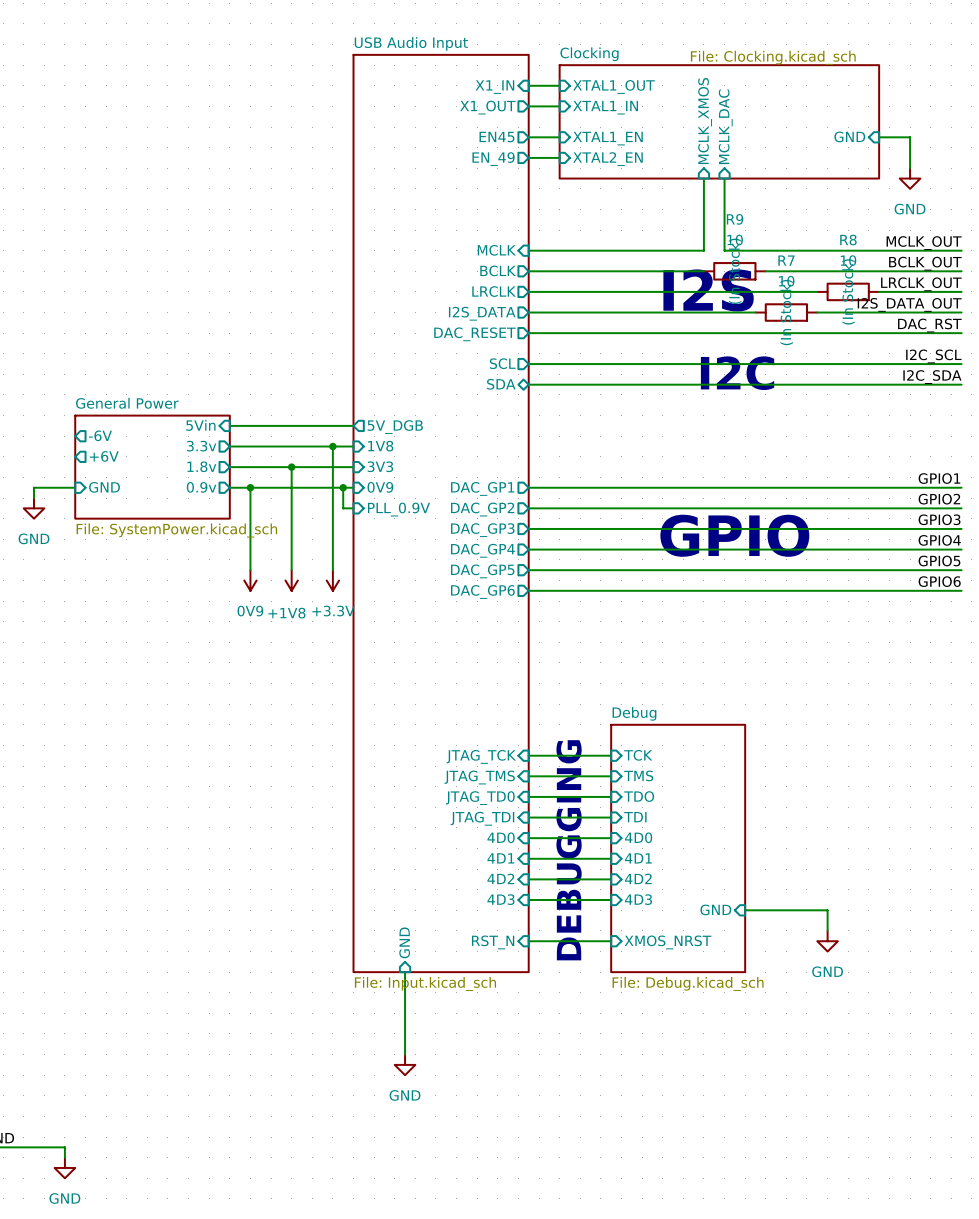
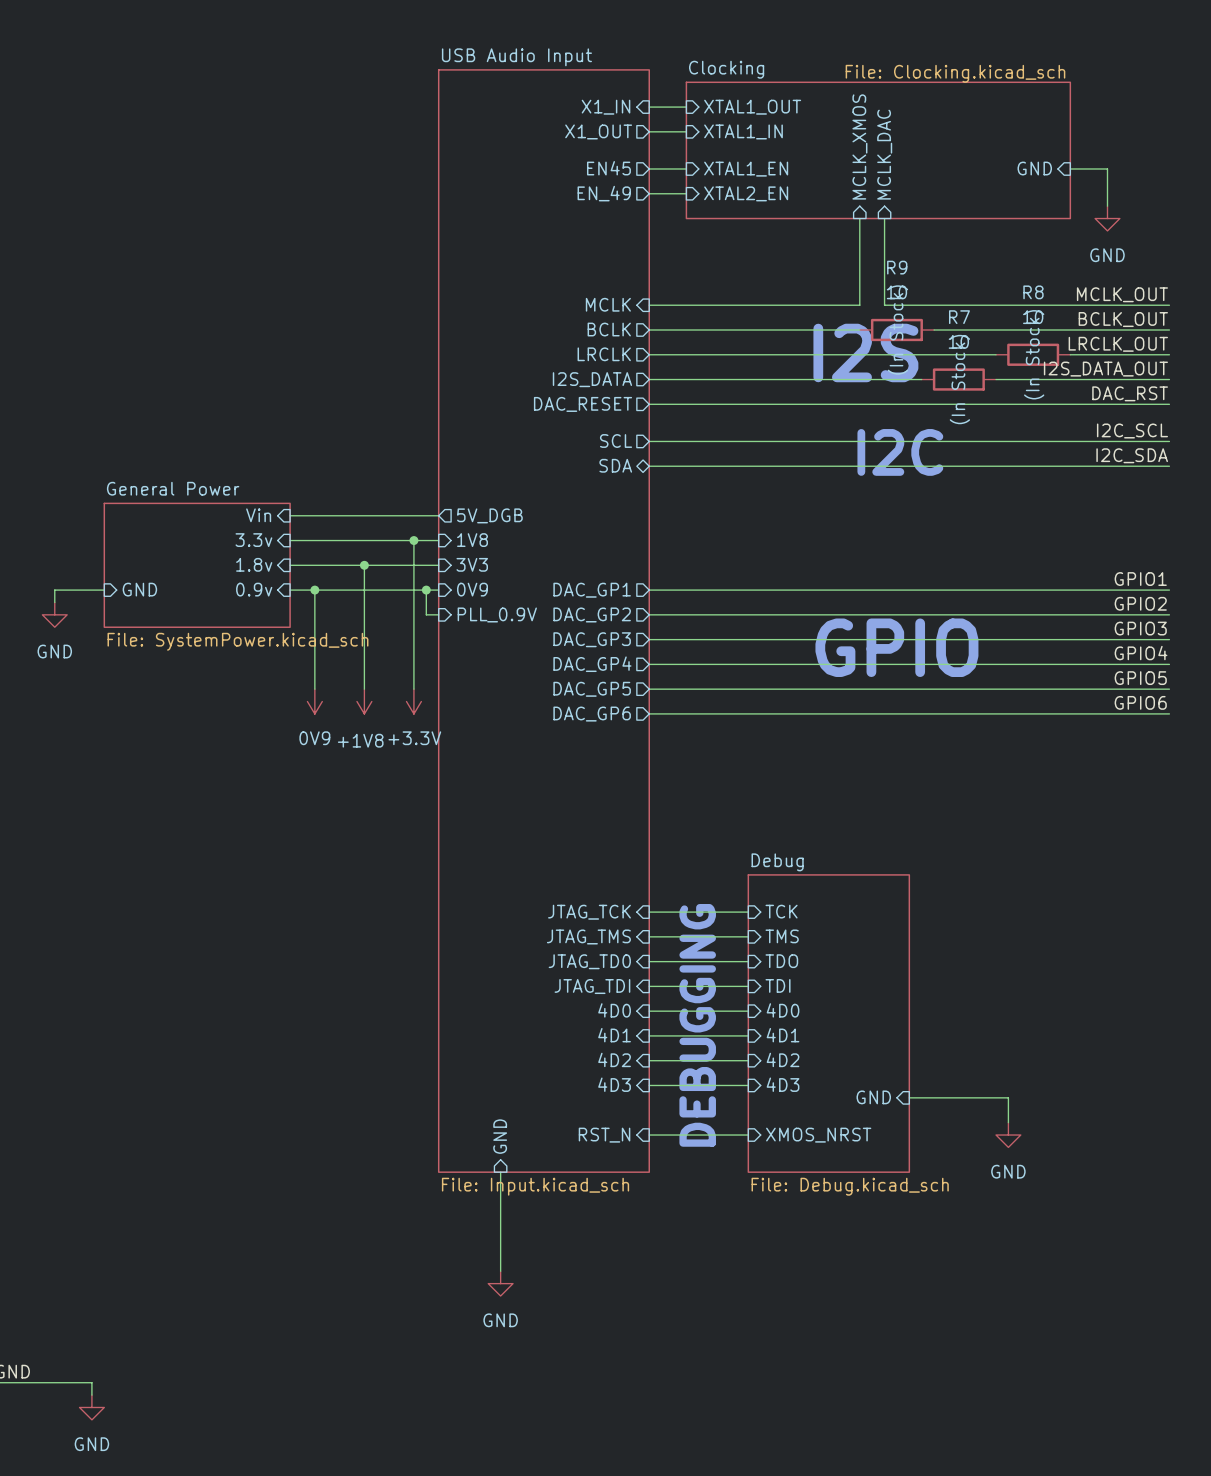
sheet pin: 5Vin (200, 425) -> Vin (258, 515)
sheet pin: -6V (100, 435) -> none
sheet pin shape: output (201, 446) -> input (253, 540)
sheet pin: +6V (104, 456) -> none
sheet pin shape: output (201, 466) -> input (254, 564)
sheet pin shape: output (201, 487) -> input (254, 589)

